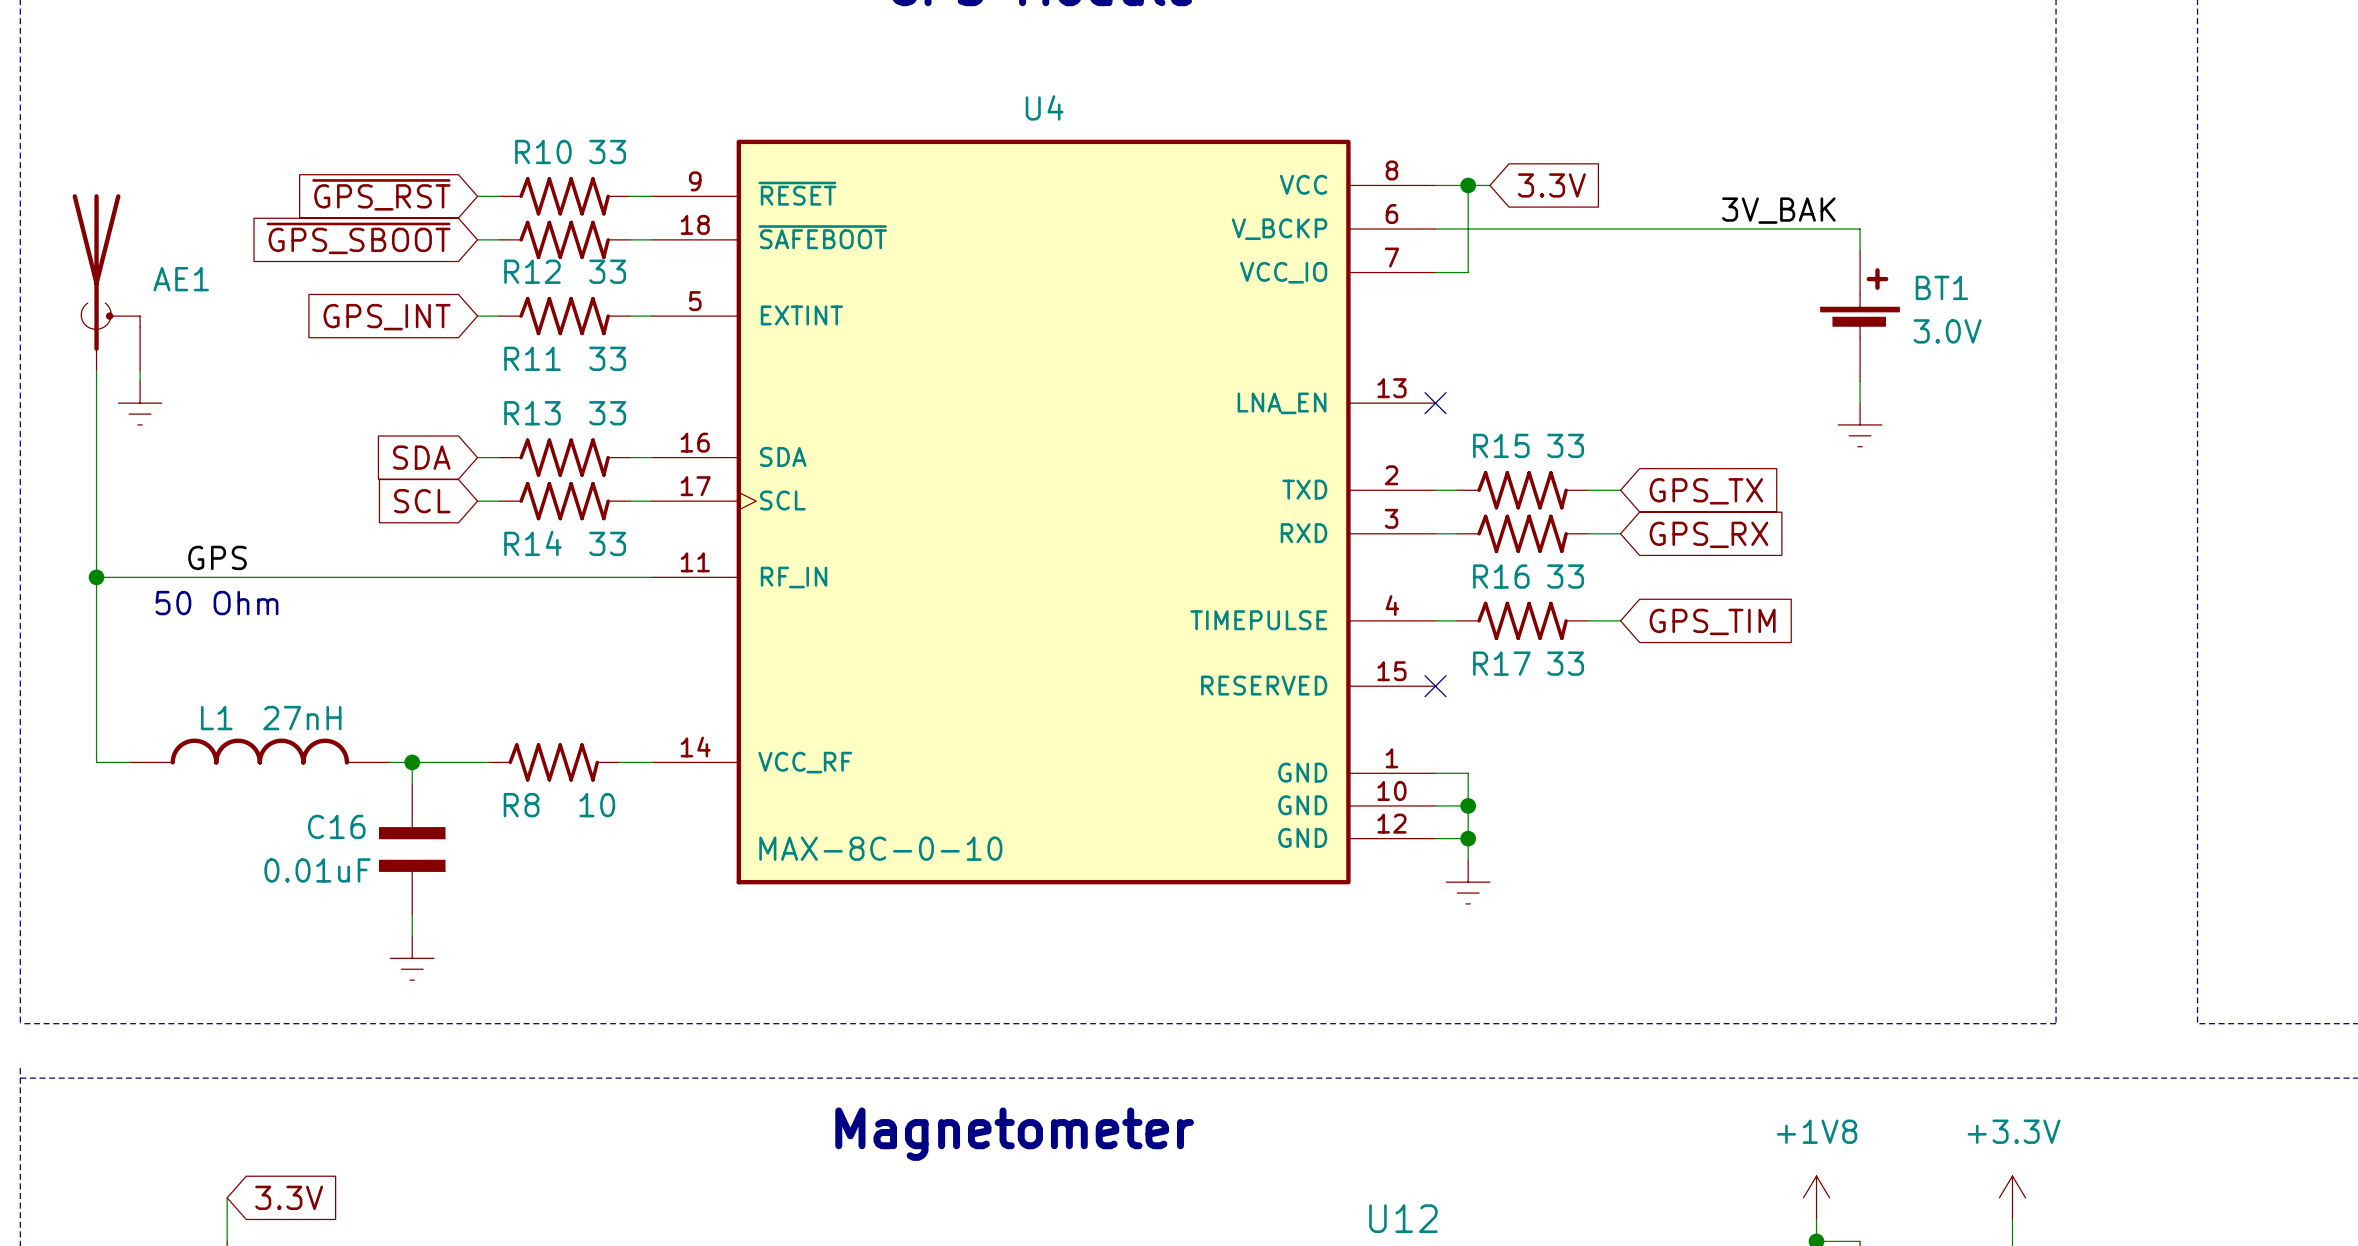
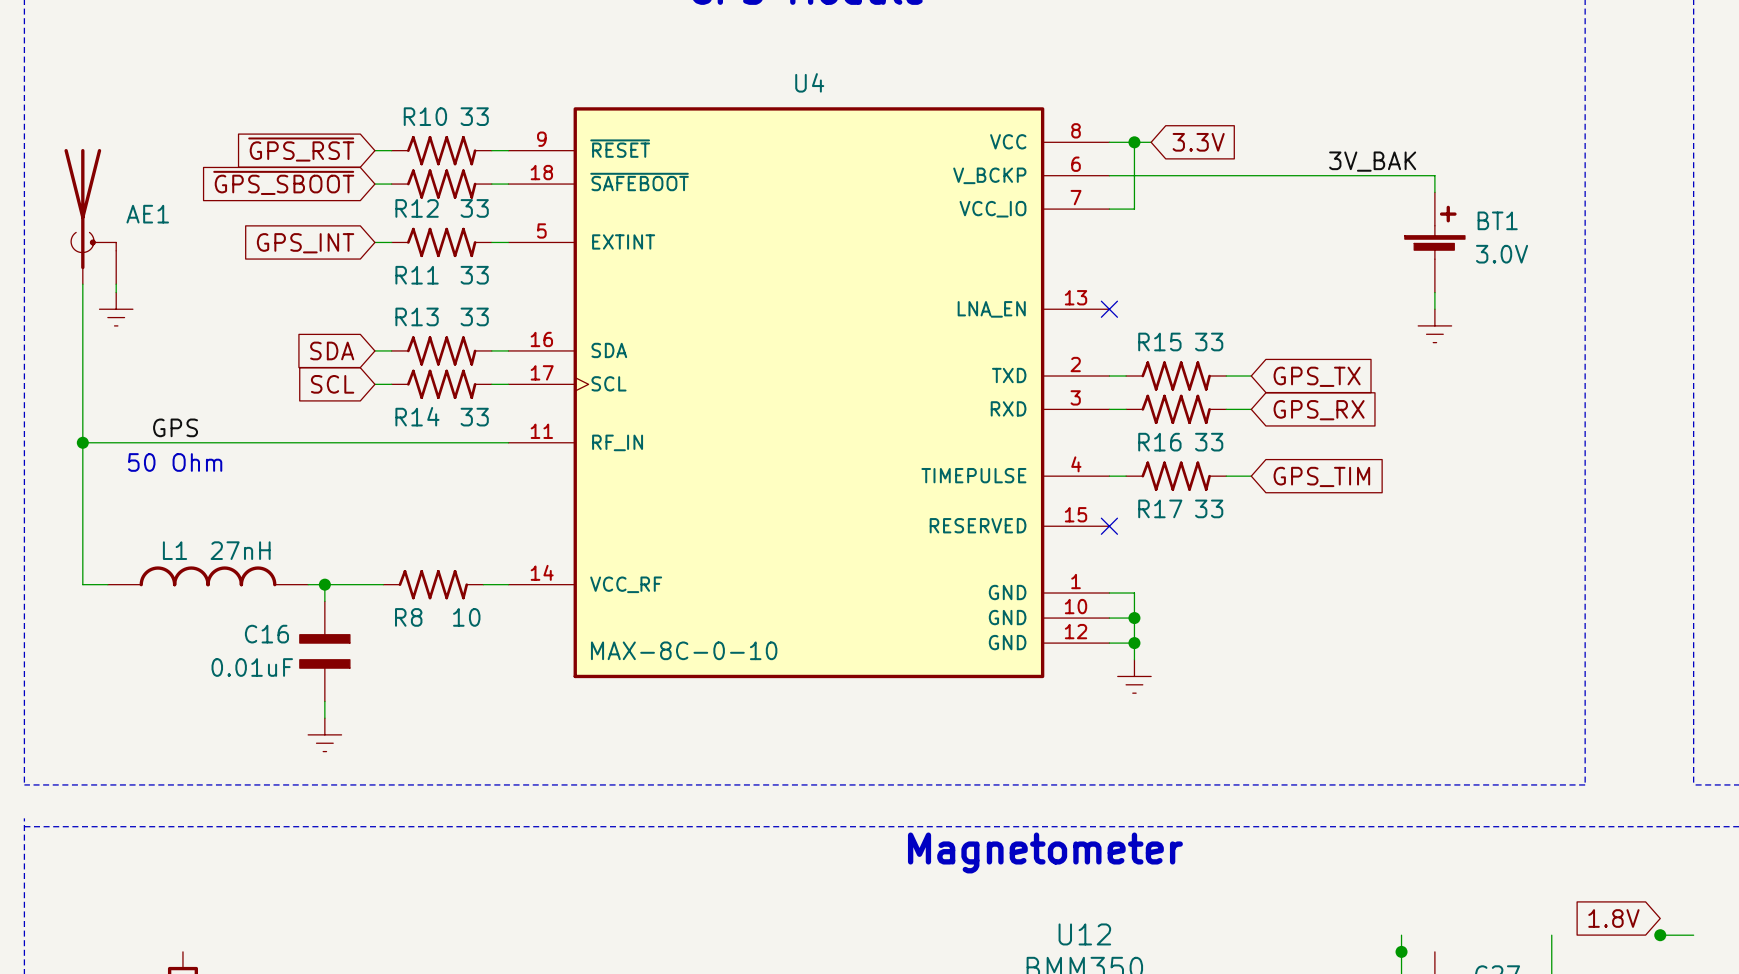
text position: Magnetometer (1014, 1134) -> Magnetometer (1045, 852)
wire: (227, 1197) (227, 1241) -> none
global label: 3.3V (289, 1197) -> none
power symbol: +1V8 (1816, 1197) -> none
power symbol: +3.3V (2012, 1197) -> none
global label: none -> 1.8V (1613, 918)
junction: none -> (1660, 935)
wire: (1816, 1241) (1860, 1241) -> (1660, 935) (1693, 935)

